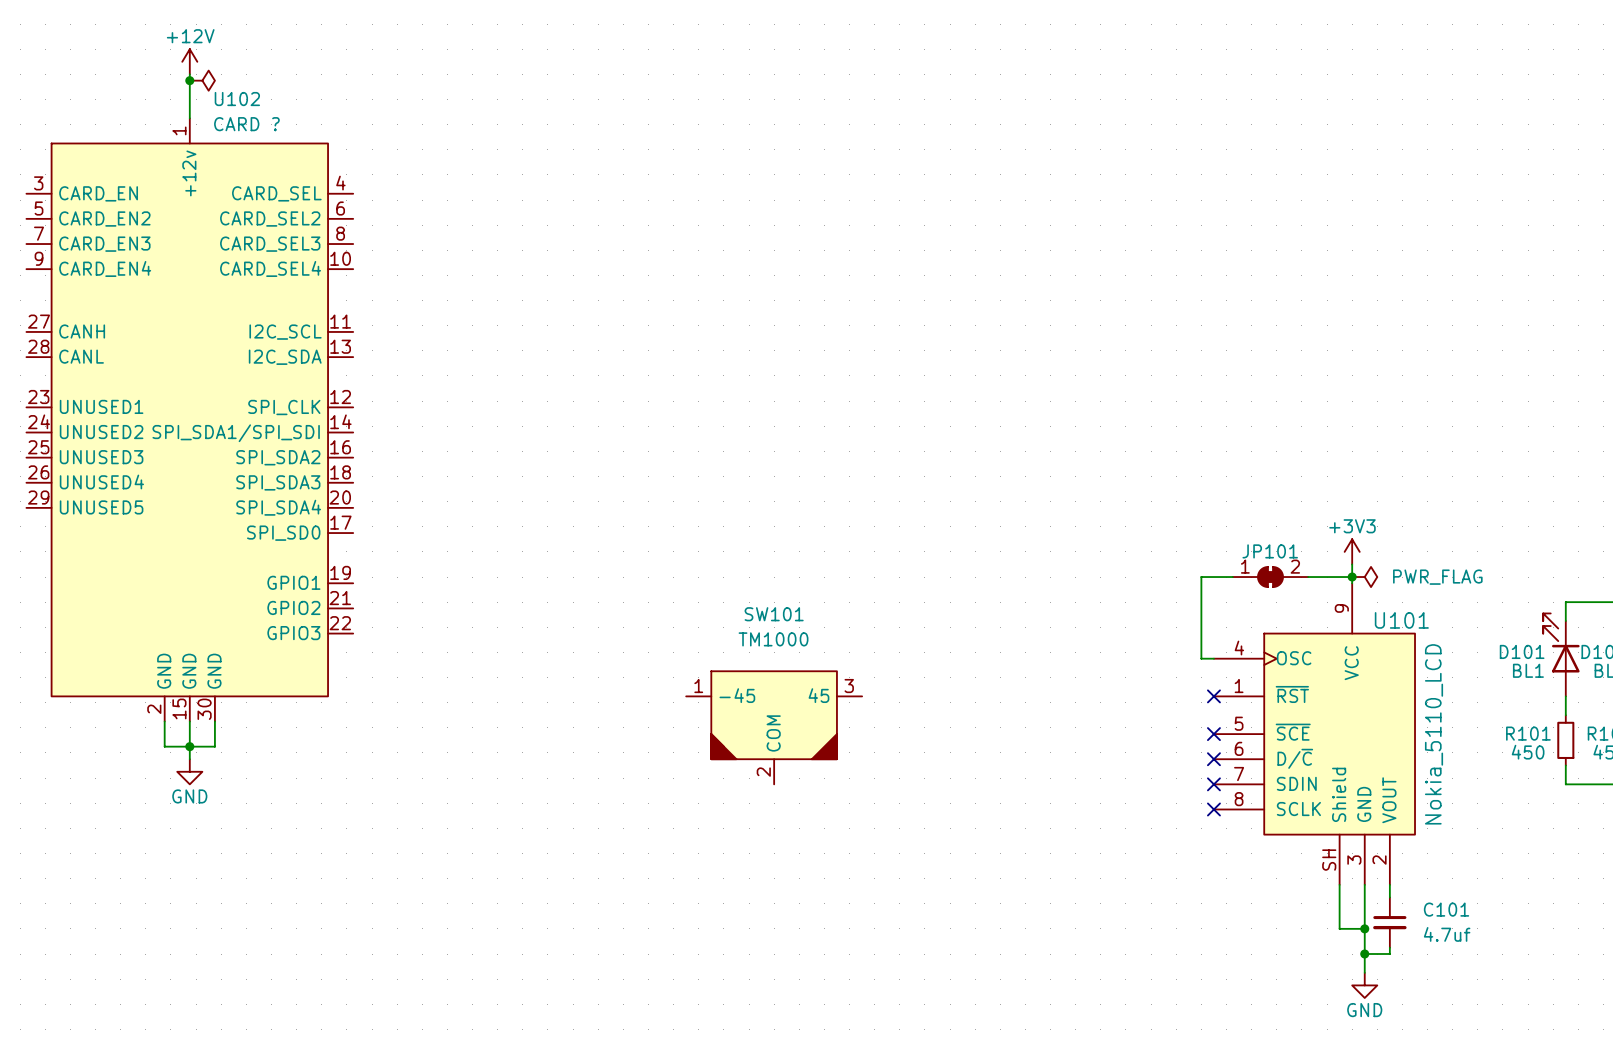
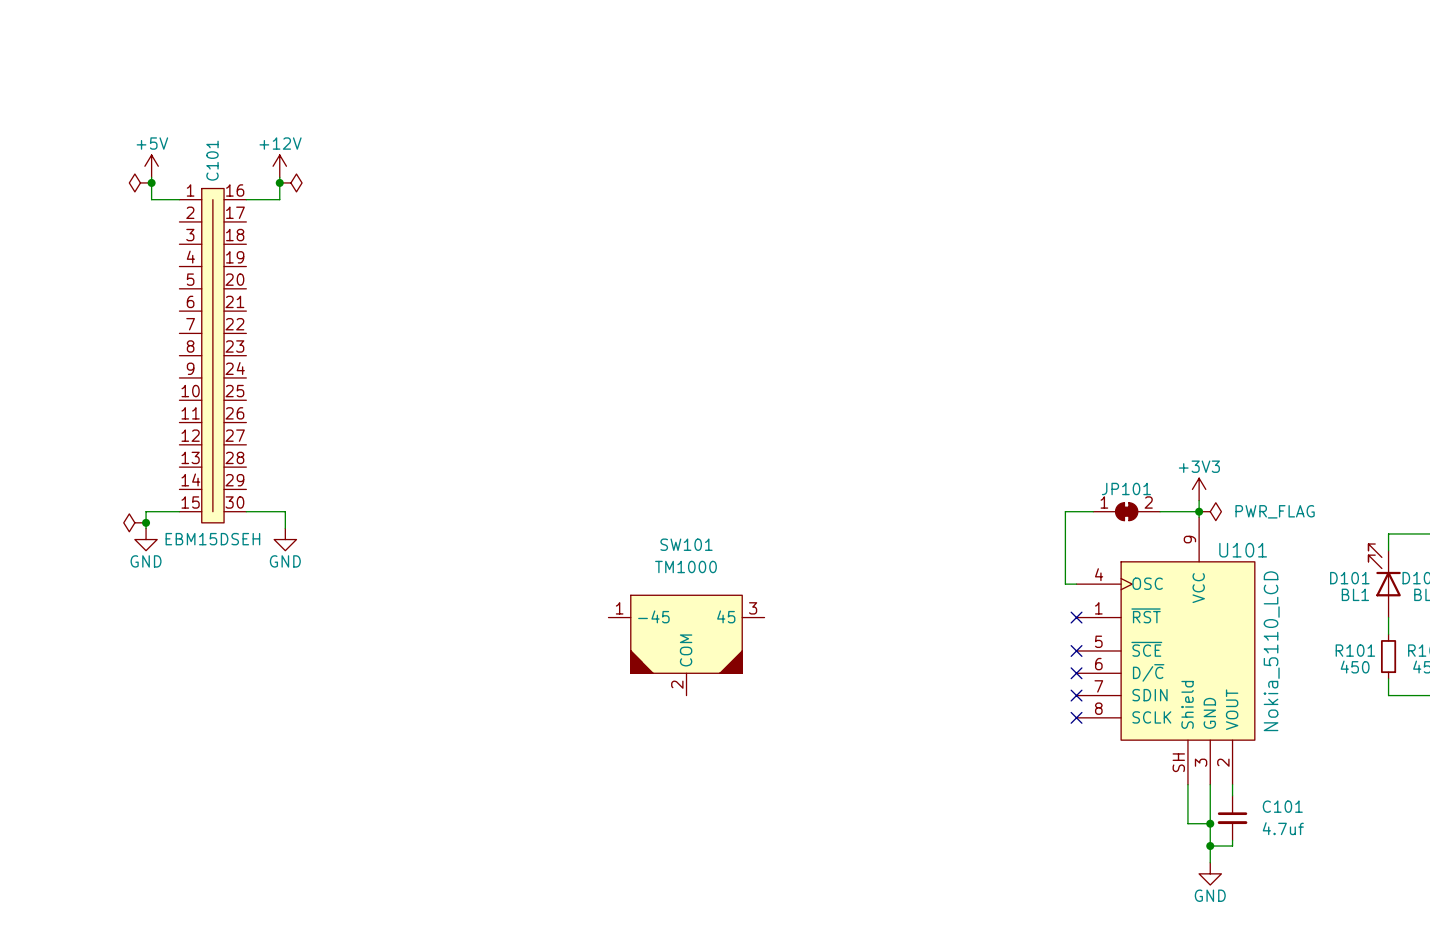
power symbol position: +12V (189, 61) -> +12V (279, 166)
wire: (189, 74) (189, 118) -> none
junction: (189, 80) -> none
power symbol: (202, 80) -> none
power symbol: none -> +5V (151, 166)
power symbol: none -> (140, 182)
junction: none -> (151, 182)
junction: none -> (279, 182)
power symbol: none -> (290, 182)
C101: none -> EBM15DSEH (212, 355)
U102: CARD ? (189, 419) -> none
power symbol: none -> (134, 522)
junction: none -> (146, 522)
power symbol: none -> GND (146, 539)
power symbol: none -> GND (285, 539)
wire: (164, 721) (164, 746) (214, 746) (214, 721) -> none
wire: (189, 721) (189, 759) -> none
junction: (189, 746) -> none
power symbol: GND (189, 771) -> none

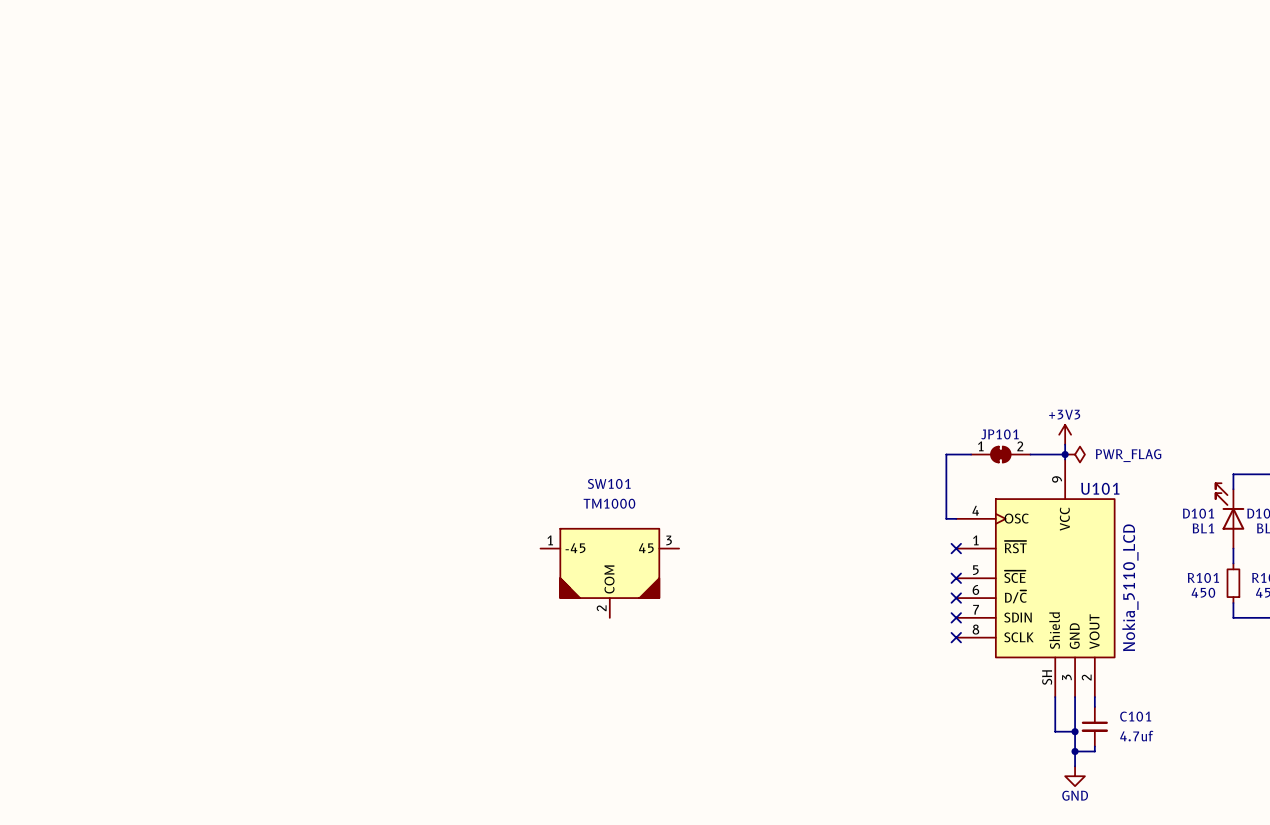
power symbol: +5V (151, 166) -> none
power symbol: +12V (279, 166) -> none
wire: (151, 177) (151, 199) (179, 199) -> none
wire: (279, 177) (279, 199) (246, 199) -> none
power symbol: (140, 182) -> none
junction: (151, 182) -> none
junction: (279, 182) -> none
power symbol: (290, 182) -> none
C101: EBM15DSEH (212, 355) -> none
wire: (179, 511) (146, 511) (146, 528) -> none
wire: (246, 511) (285, 511) (285, 528) -> none
power symbol: (134, 522) -> none
junction: (146, 522) -> none
power symbol: GND (146, 539) -> none
power symbol: GND (285, 539) -> none

